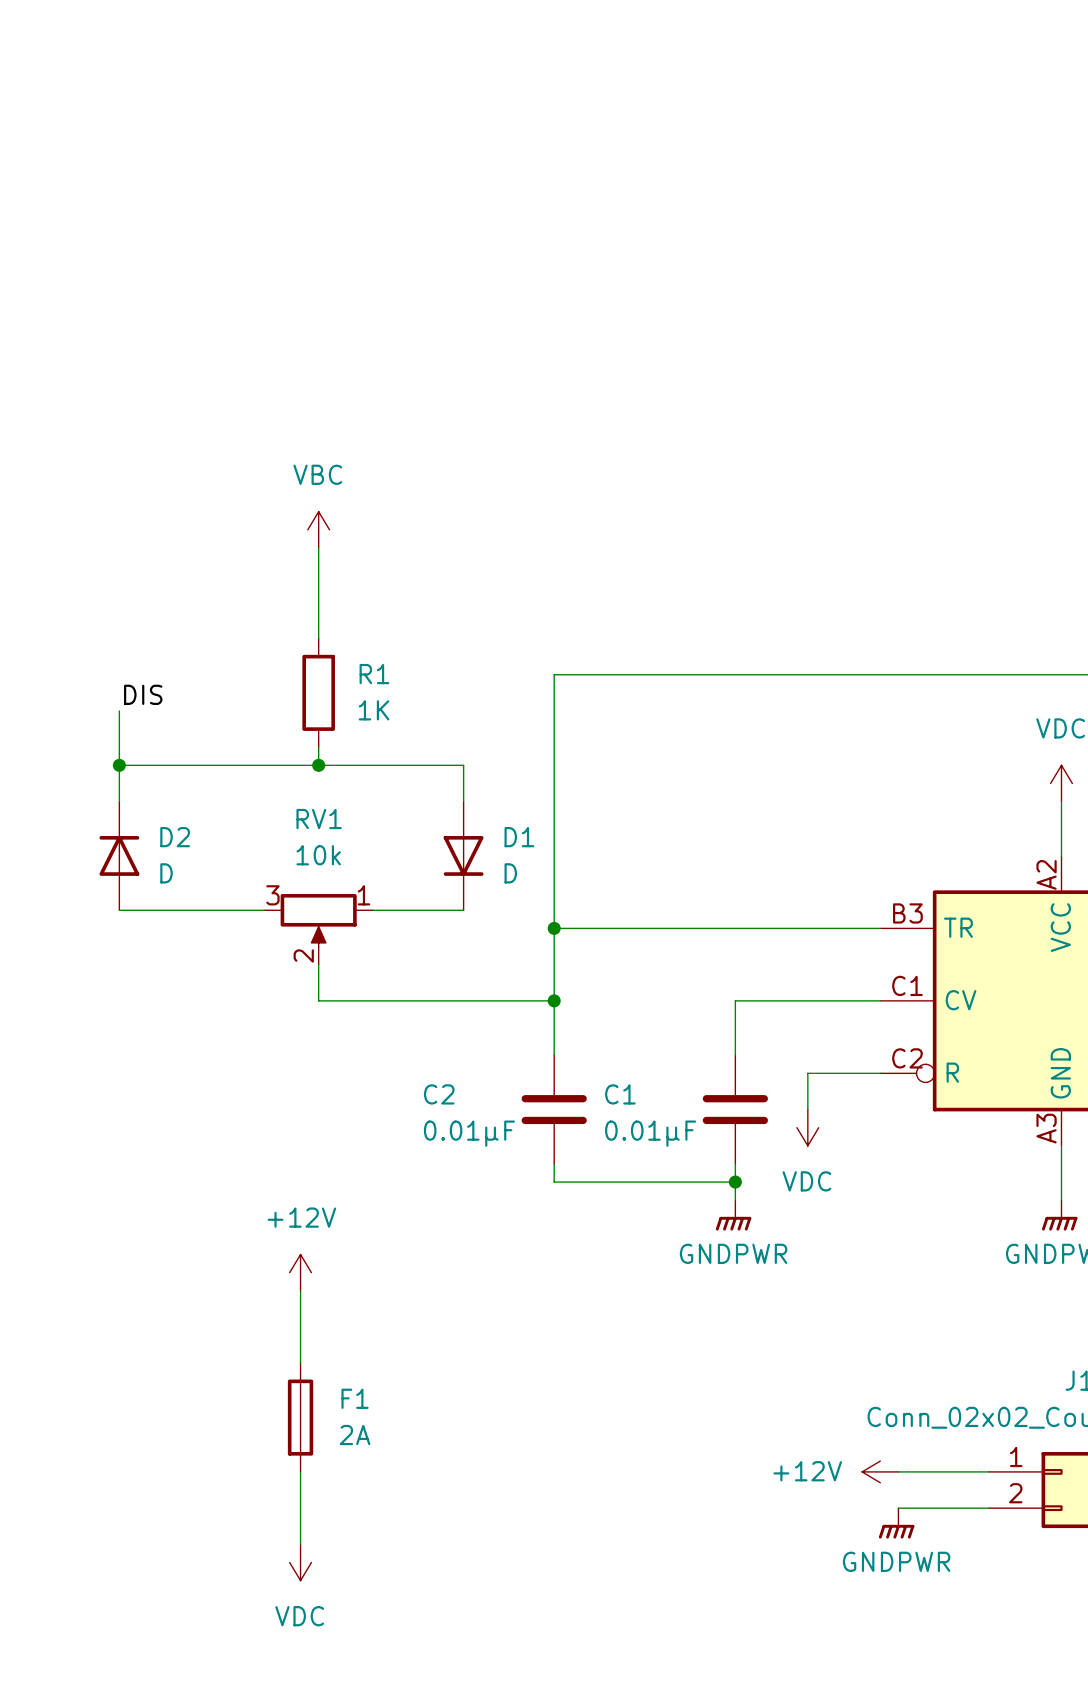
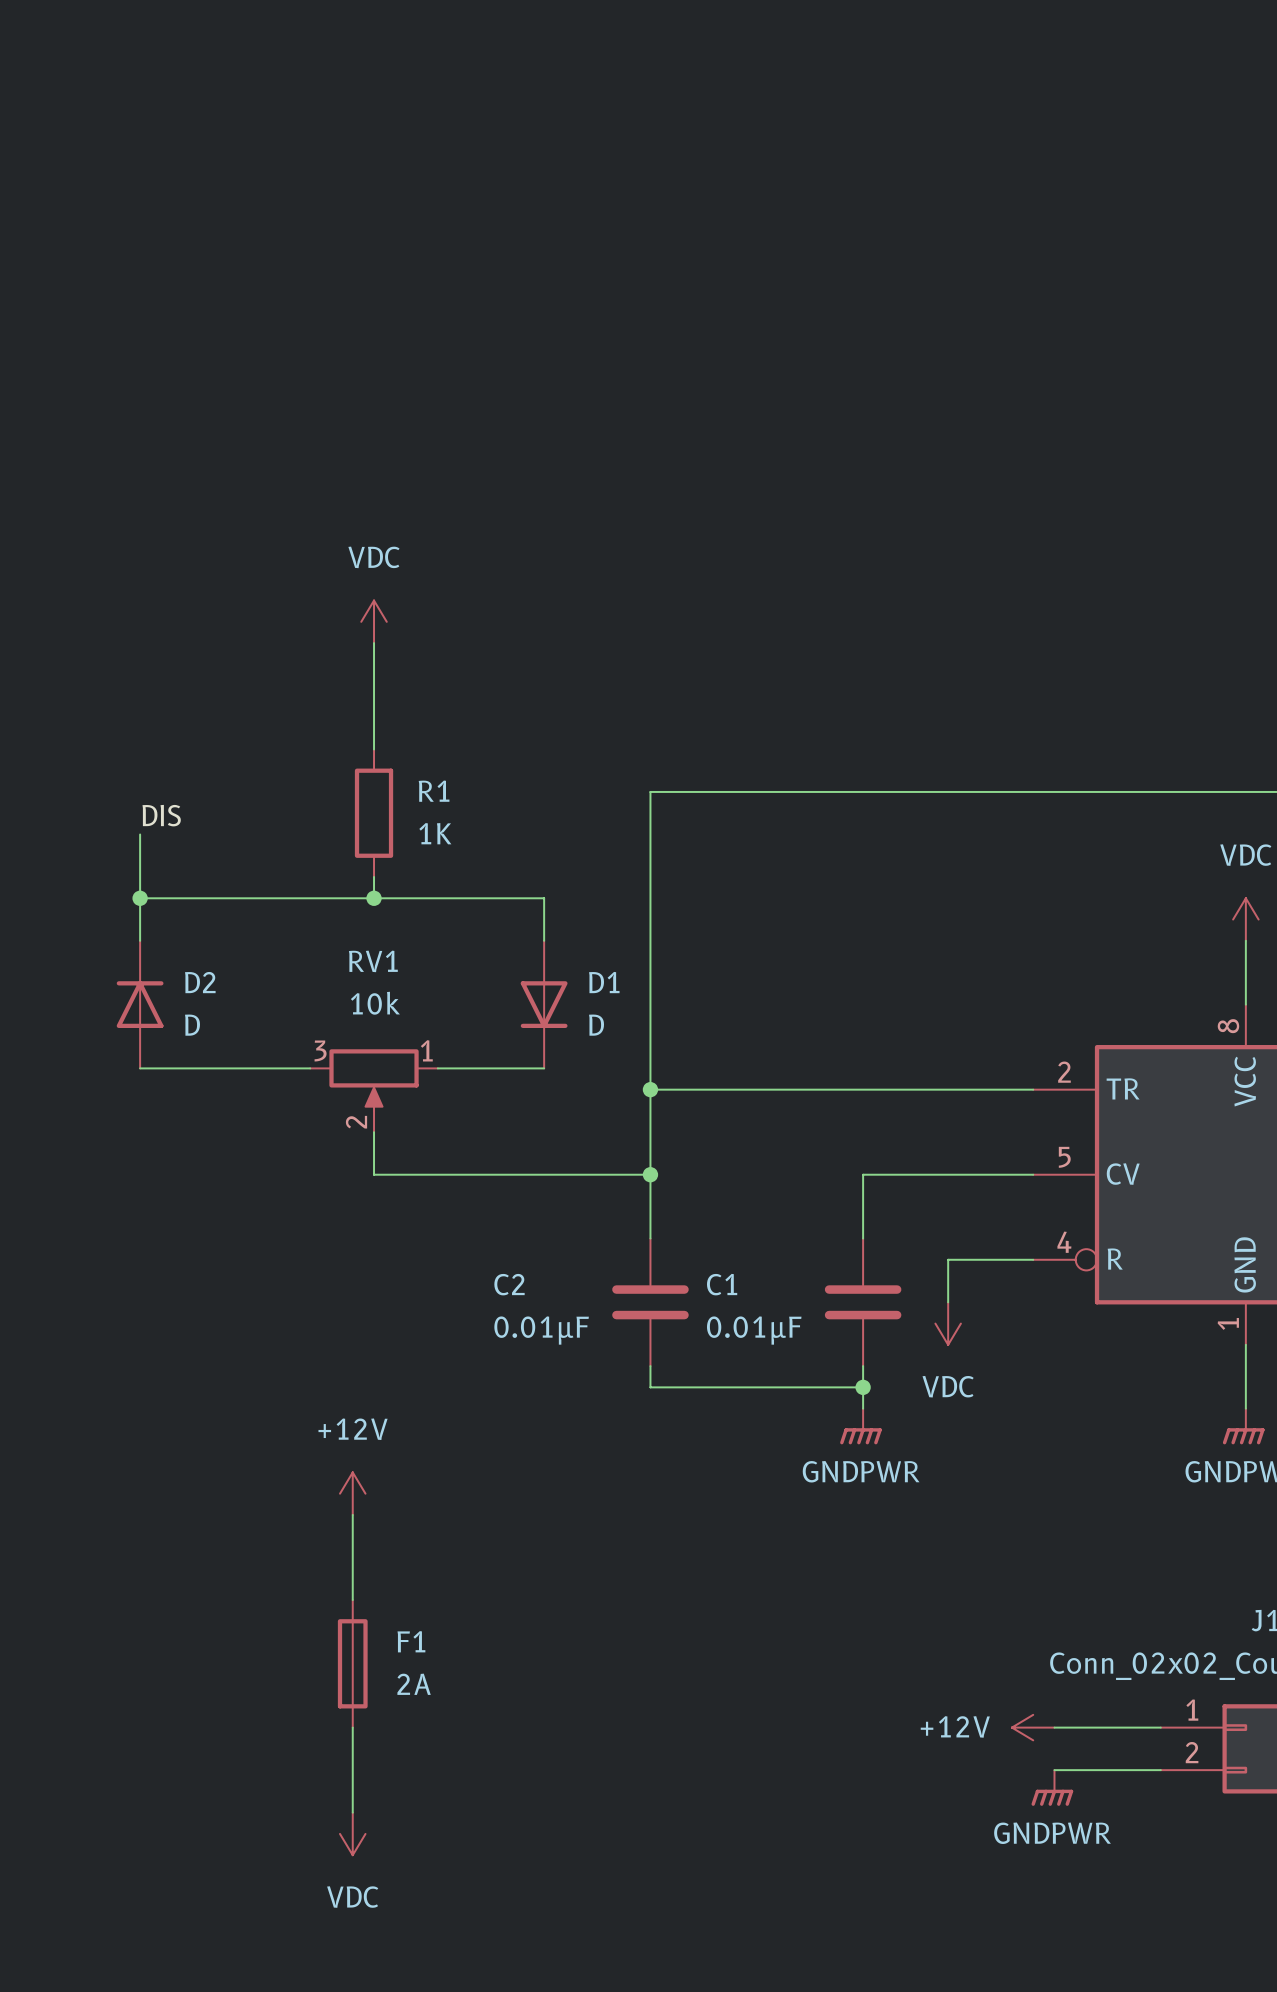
power symbol: VBC (318, 529) -> VDC (374, 621)
part pin number: A2 (1046, 874) -> 8 (1228, 1026)
part pin number: B3 (907, 913) -> 2 (1064, 1072)
part pin number: C1 (907, 985) -> 5 (1064, 1157)
part pin number: C2 (907, 1058) -> 4 (1064, 1242)
part pin number: A3 (1046, 1128) -> 1 (1228, 1323)

